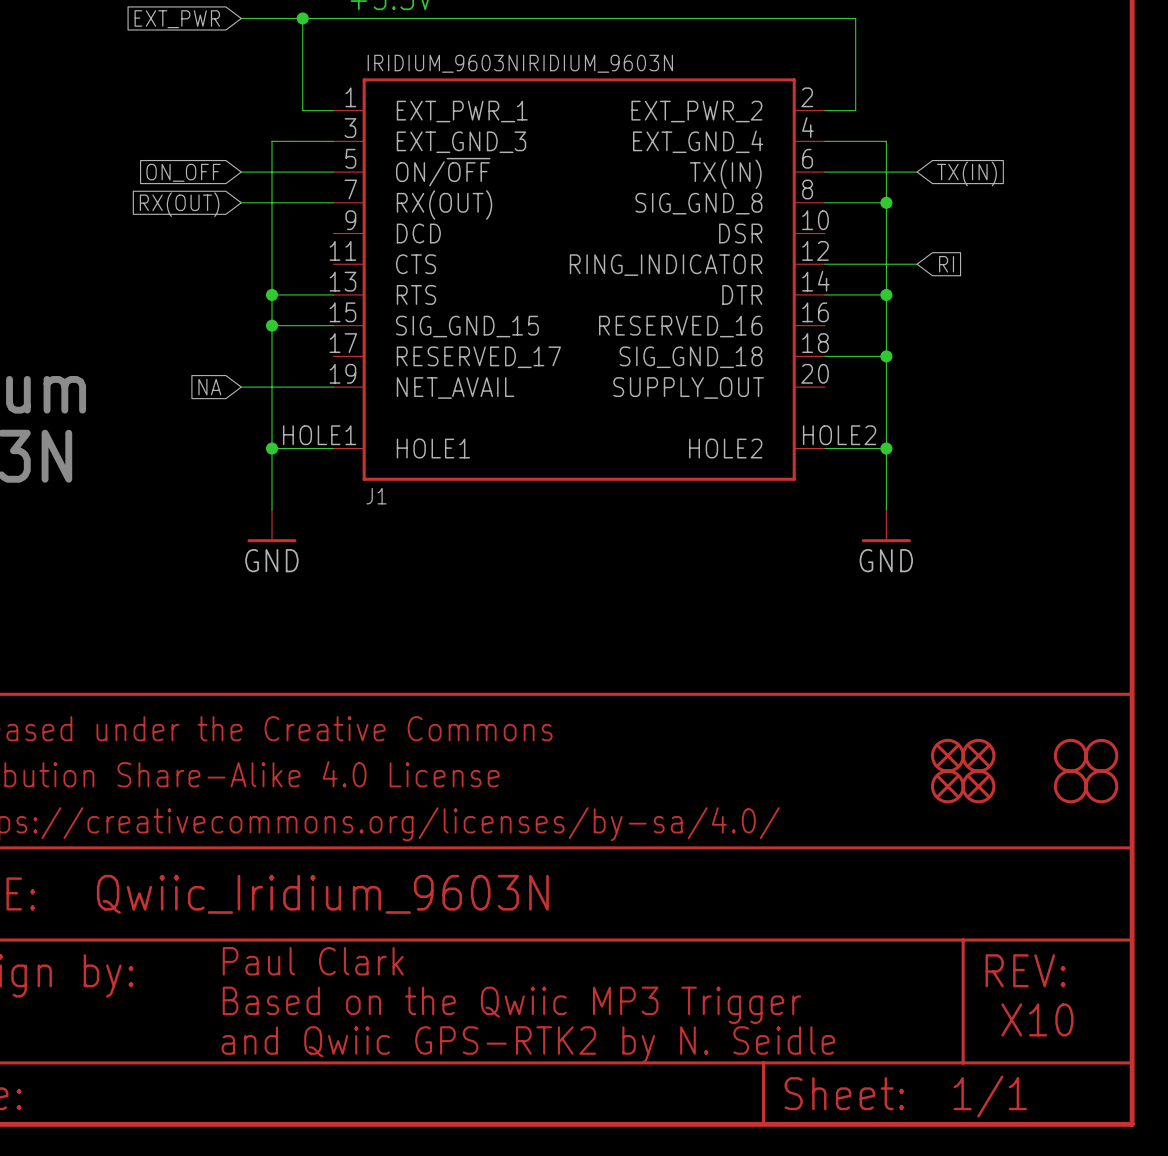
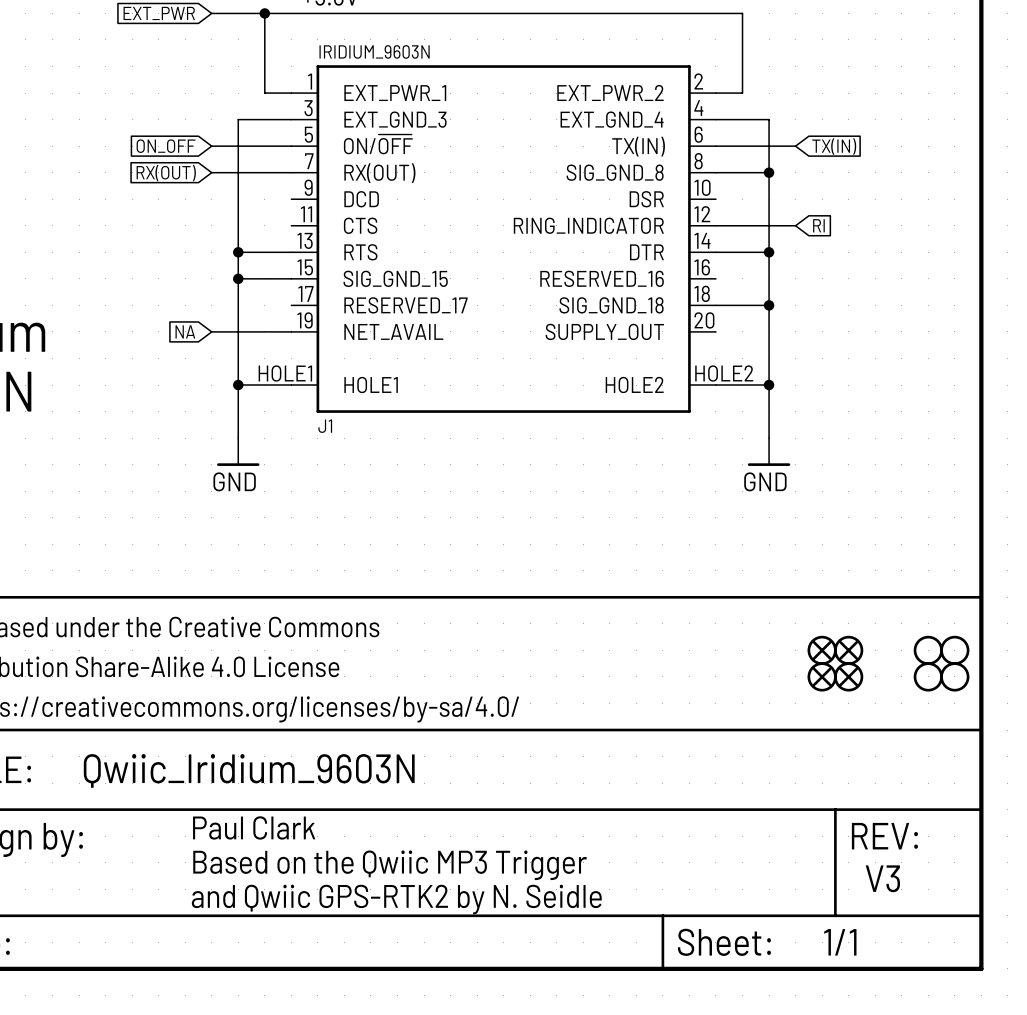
J1 value: IRIDIUM_9603NIRIDIUM_9603N (520, 63) -> IRIDIUM_9603N (374, 51)
text: X10 (1037, 1019) -> V3 (882, 878)

